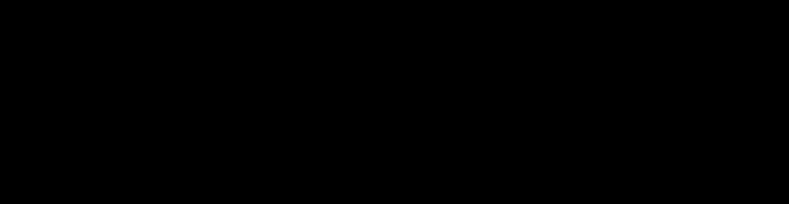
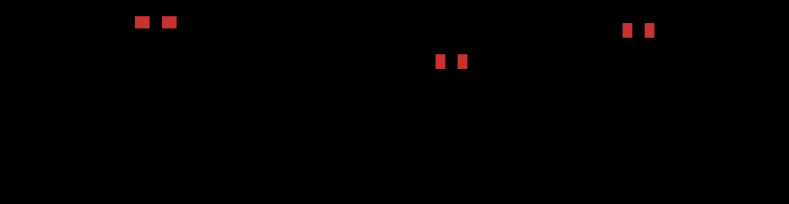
part: none -> (155, 22)
part: none -> (638, 30)
part: none -> (451, 61)

